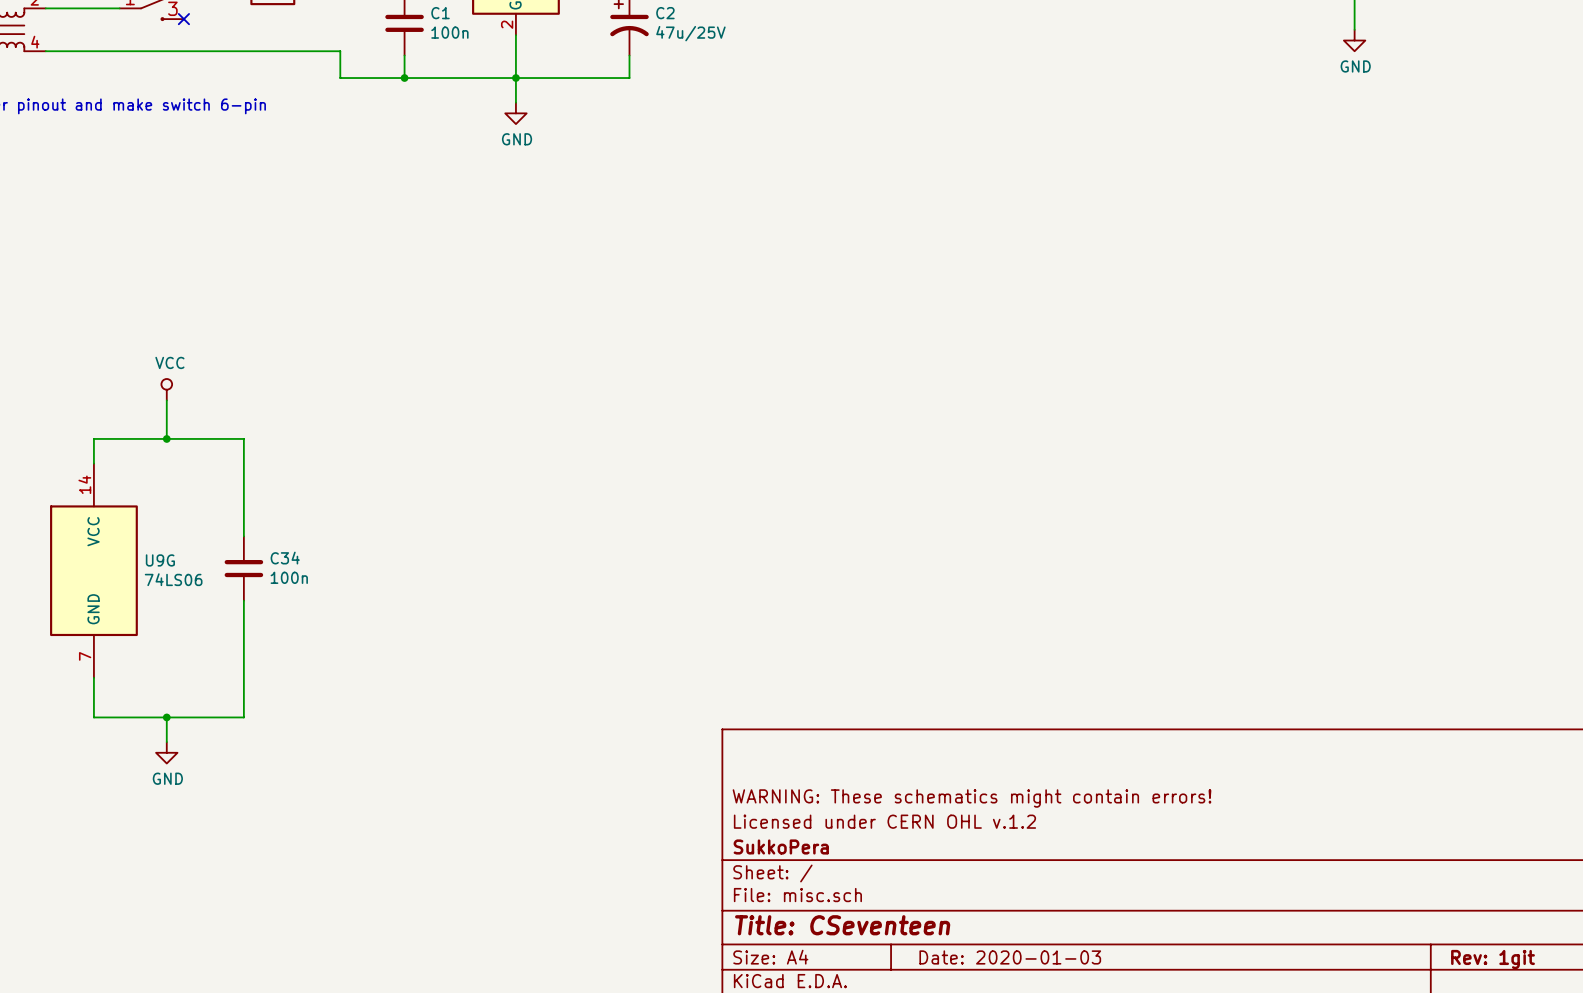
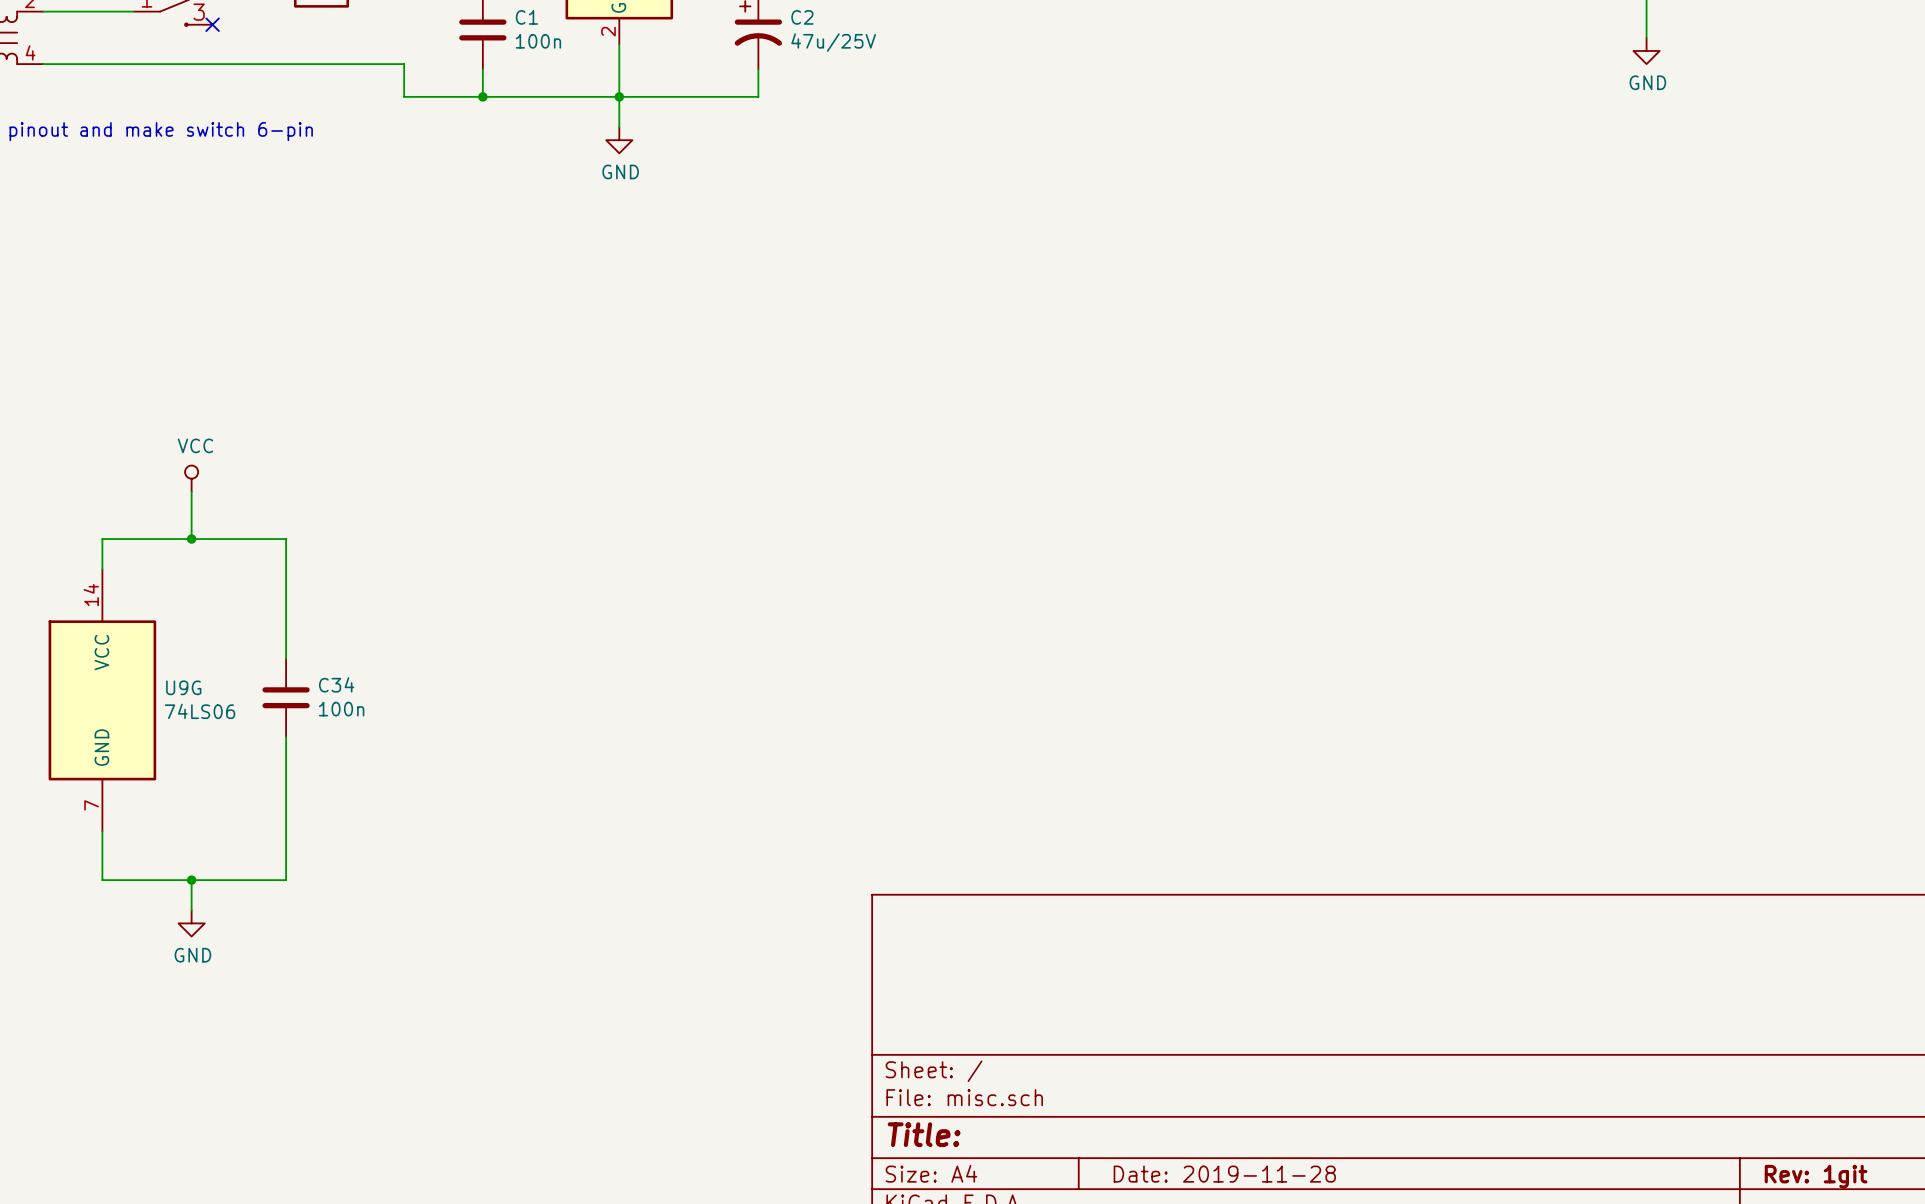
title block: WARNING: These schematics might contain errors! (972, 798) -> none
title block: Licensed under CERN OHL v.1.2 (884, 821) -> none
title block: SukkoPera (781, 846) -> none
title block: Title: CSeventeen (842, 925) -> Title: (924, 1134)
title block: Date: 2020-01-03 (1010, 957) -> Date: 2019-11-28 (1224, 1174)

